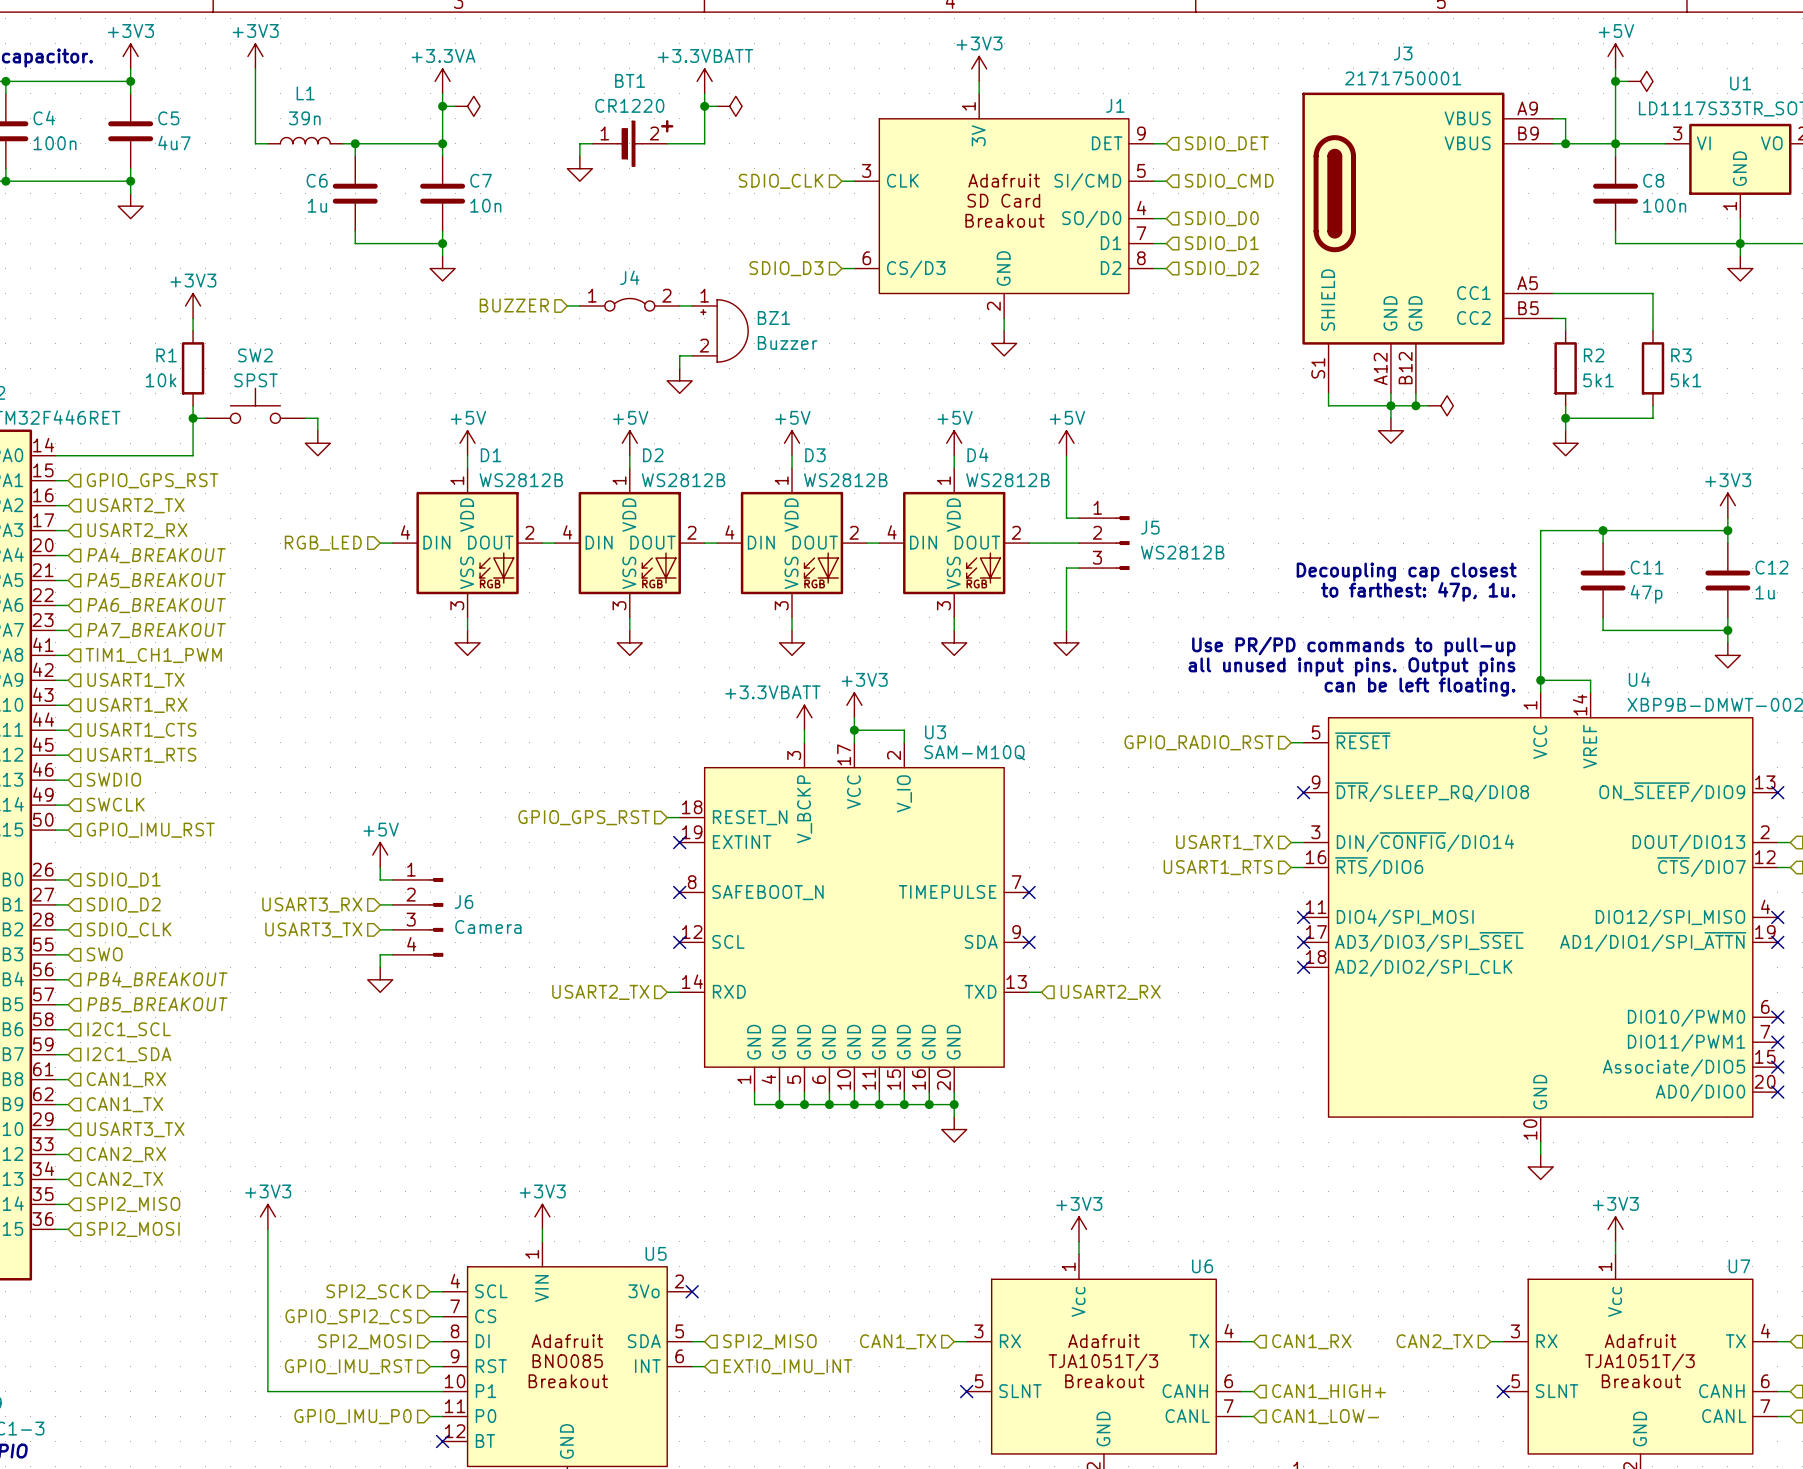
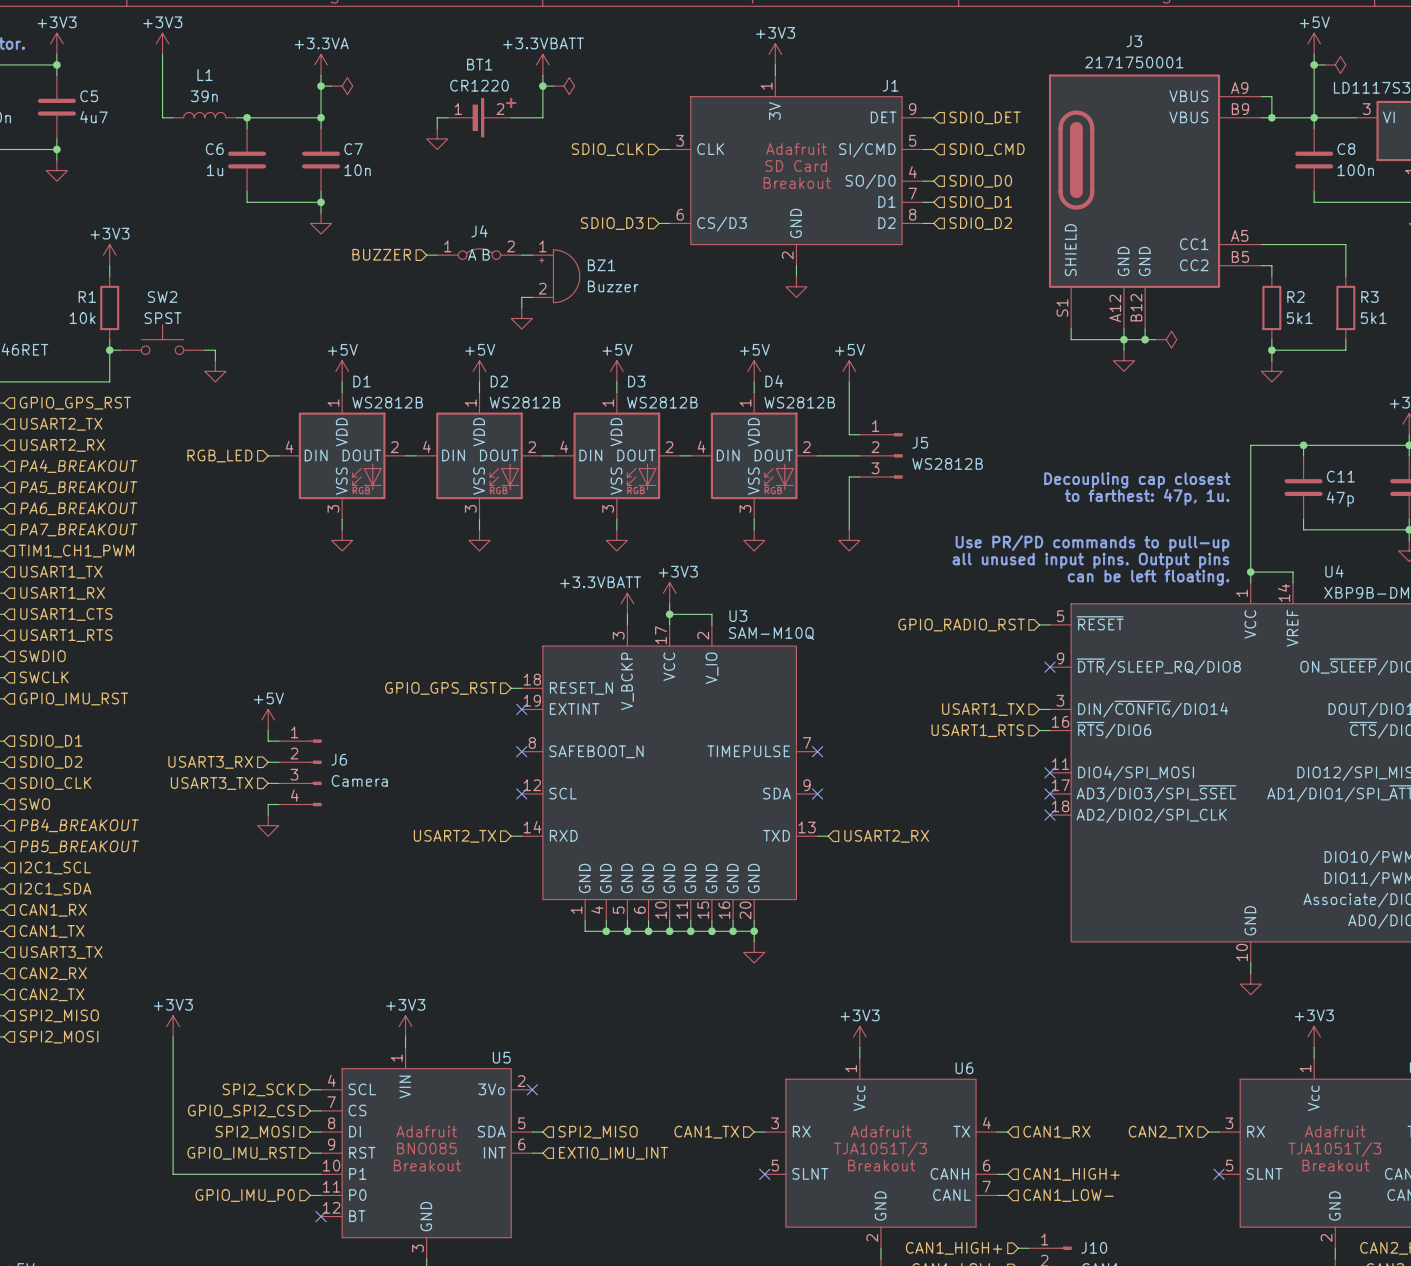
J4 pin name: none -> A (472, 254)
J4 pin name: none -> B (486, 254)

